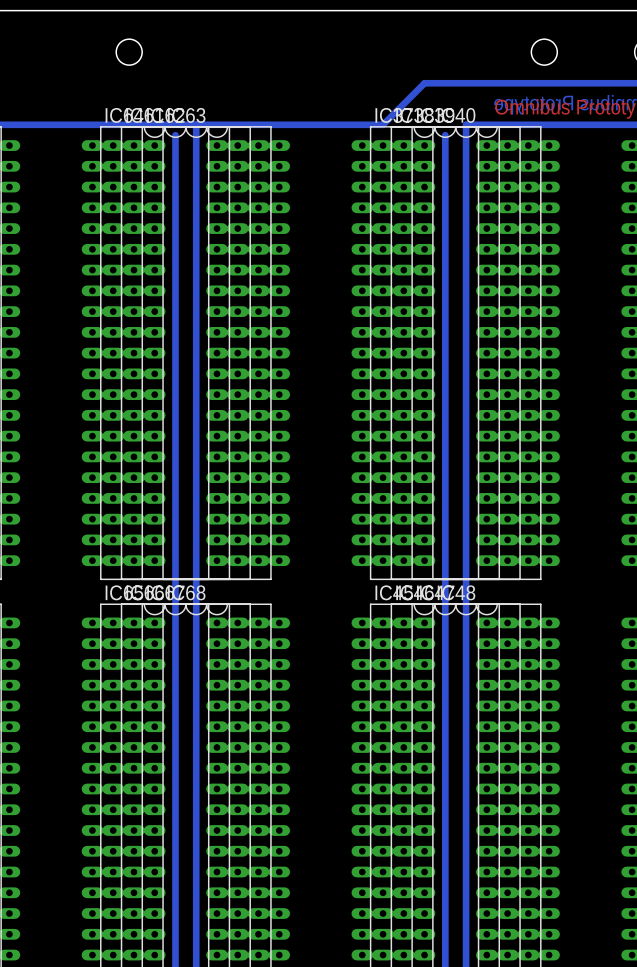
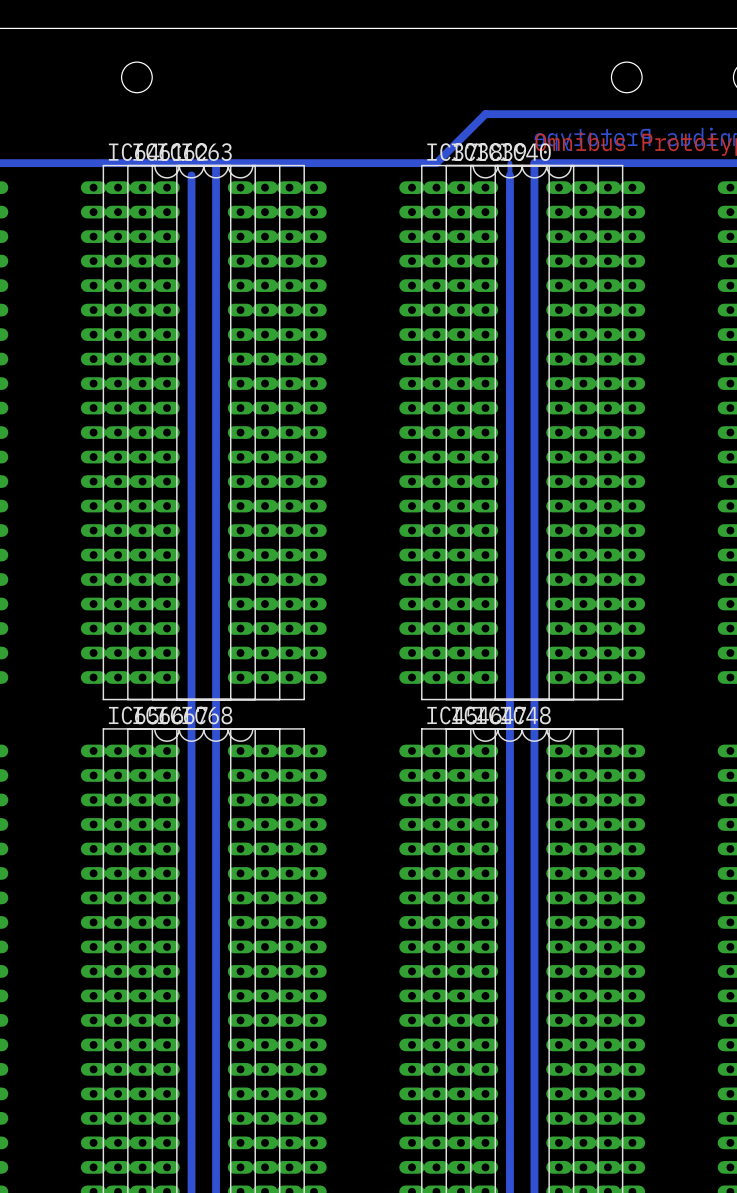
bottom track: none -> (509, 163) (509, 175)

